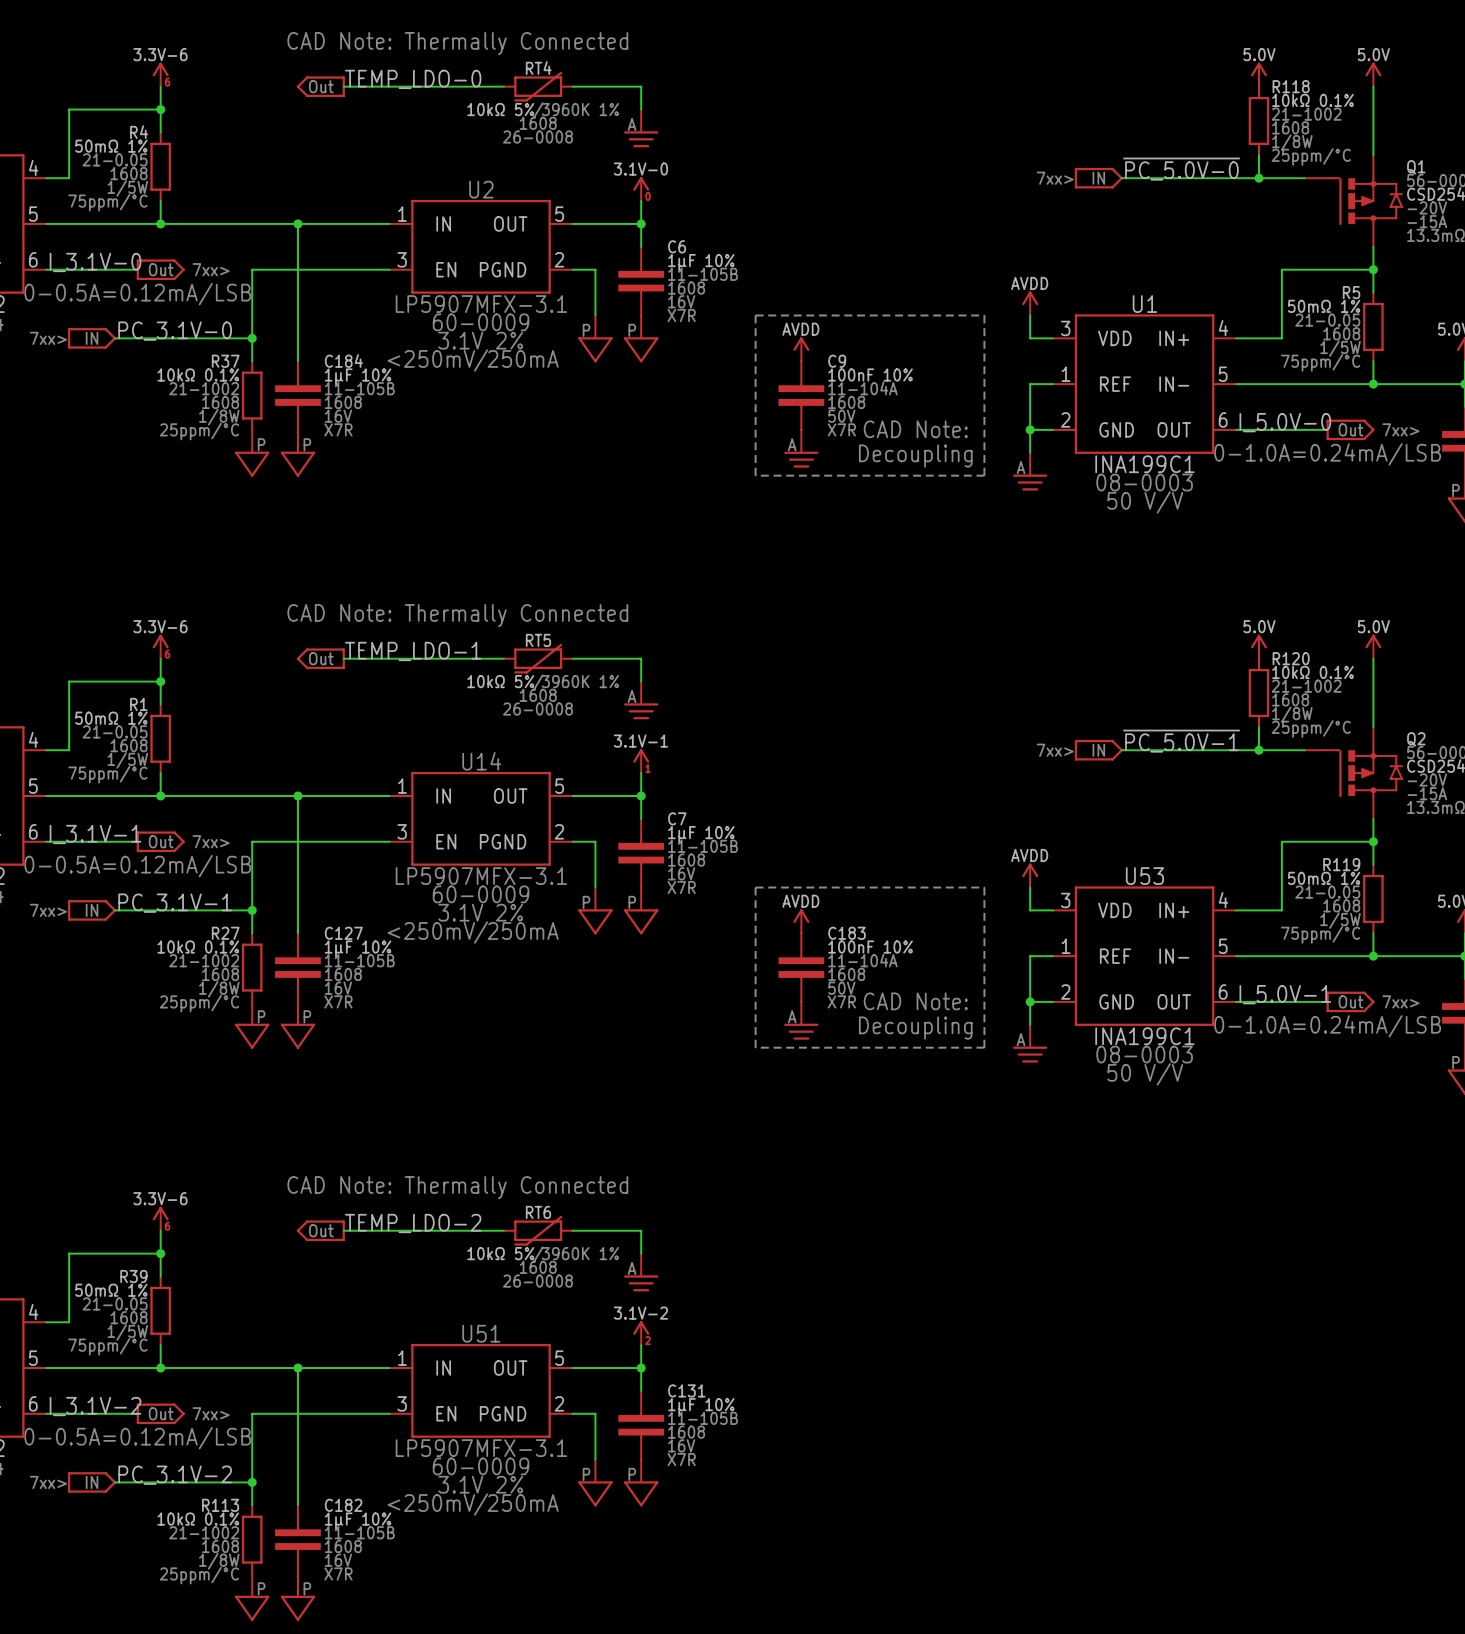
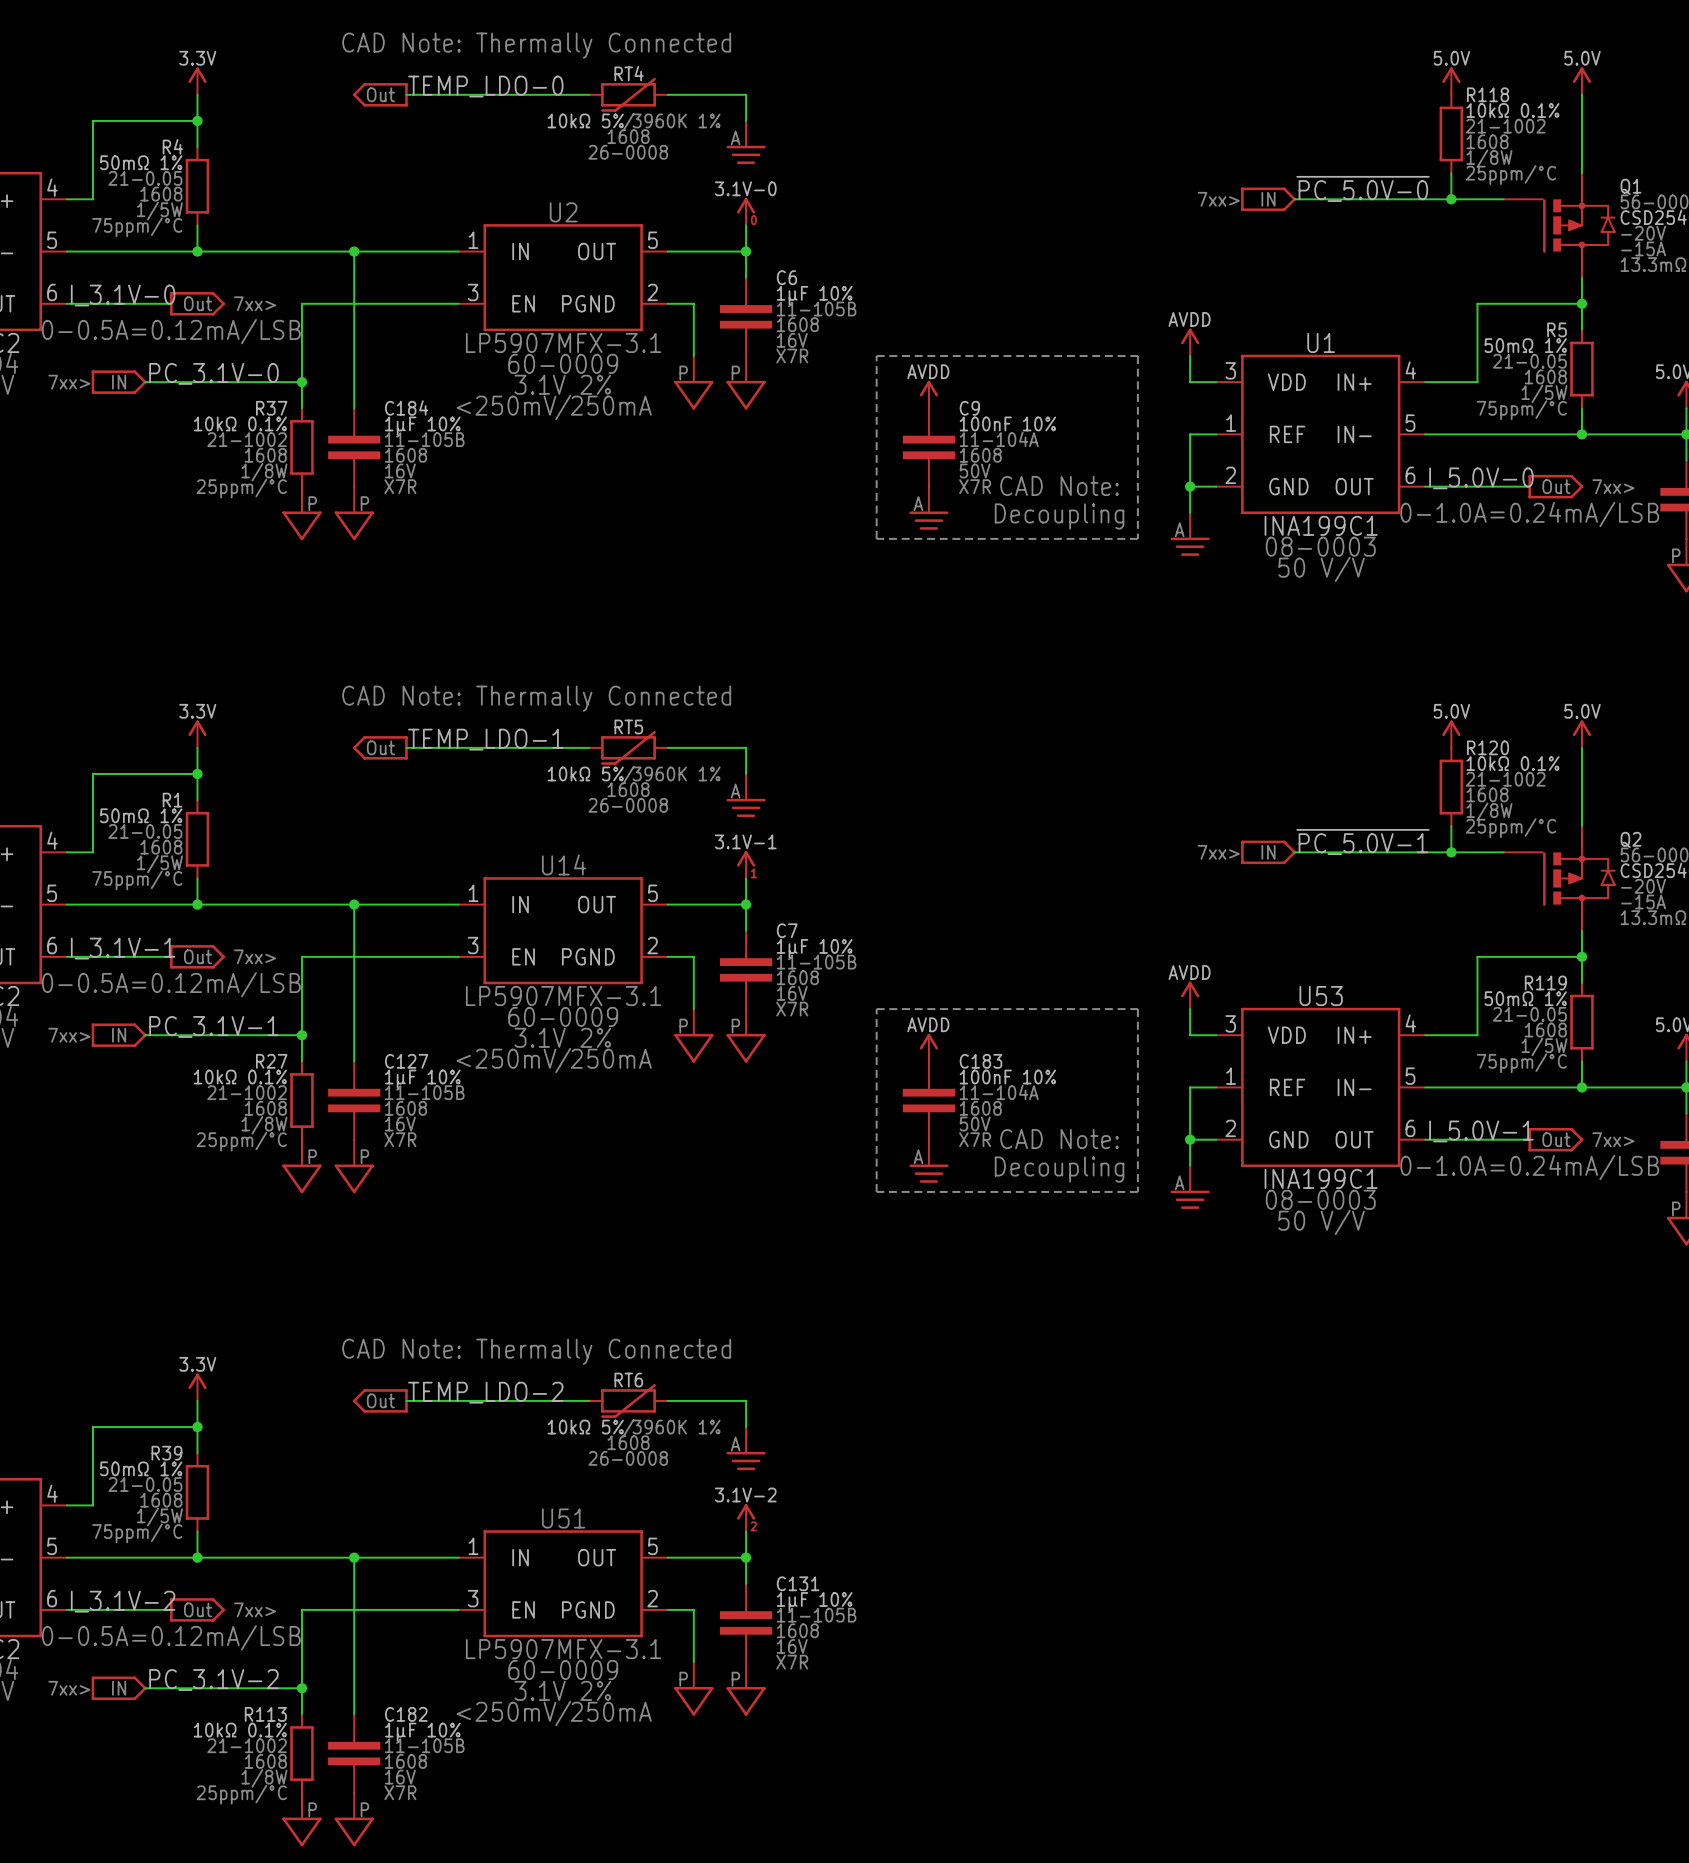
power symbol: 3.3V-6 (160, 74) -> 3.3V (197, 81)
power symbol: 3.3V-6 (160, 646) -> 3.3V (197, 734)
power symbol: 3.3V-6 (160, 1218) -> 3.3V (197, 1387)

